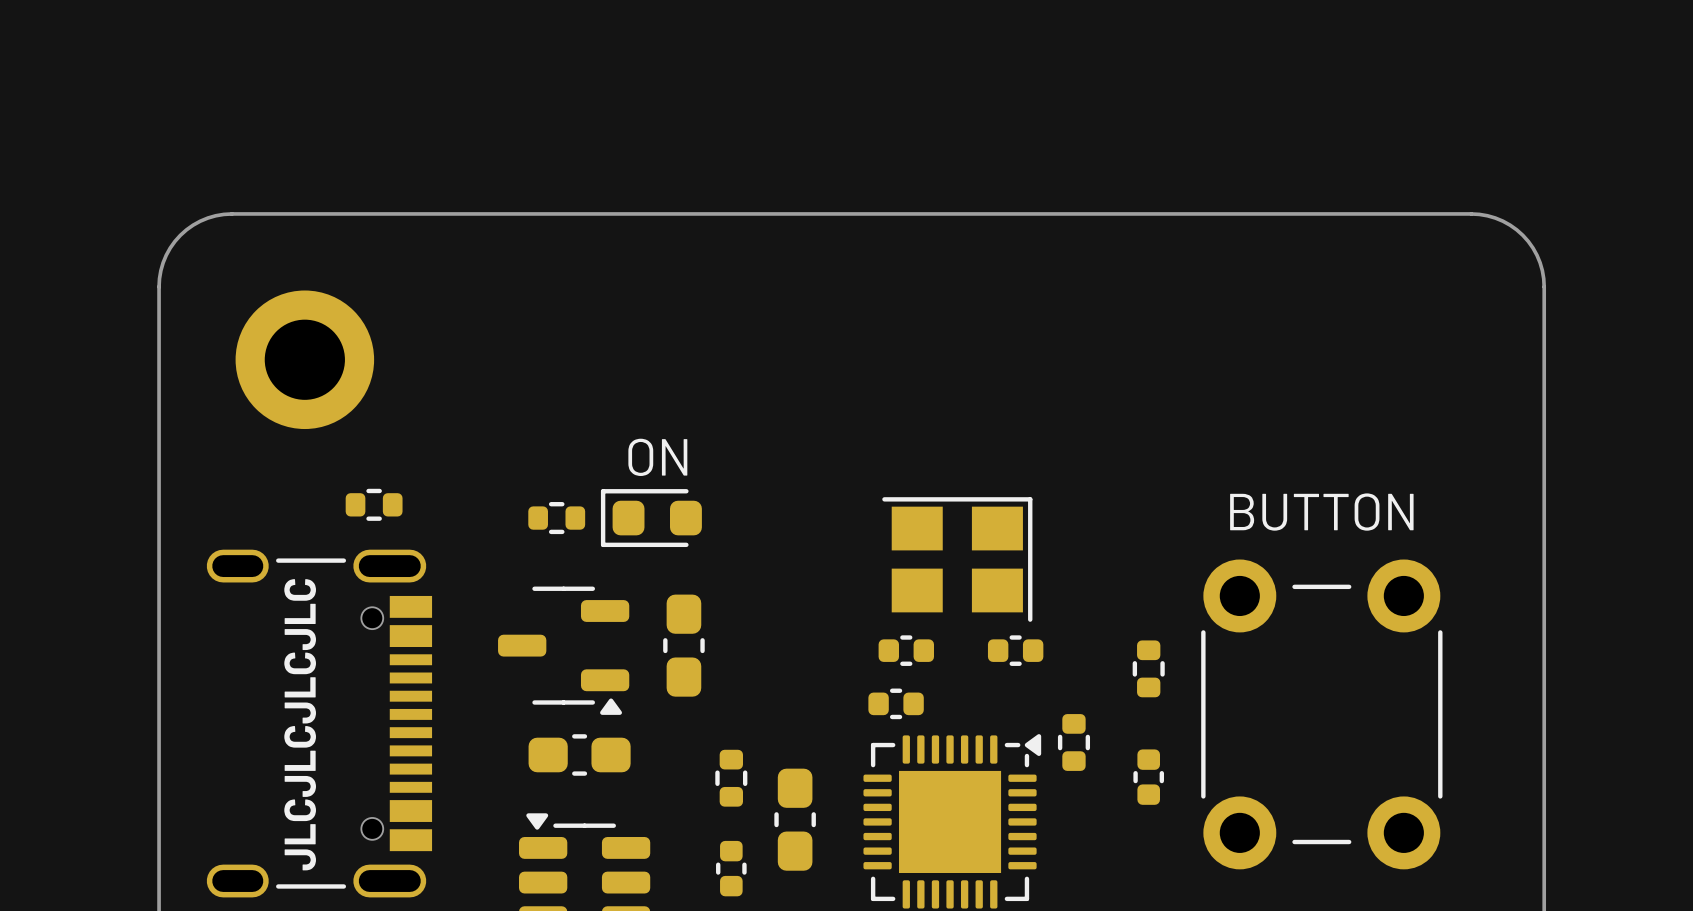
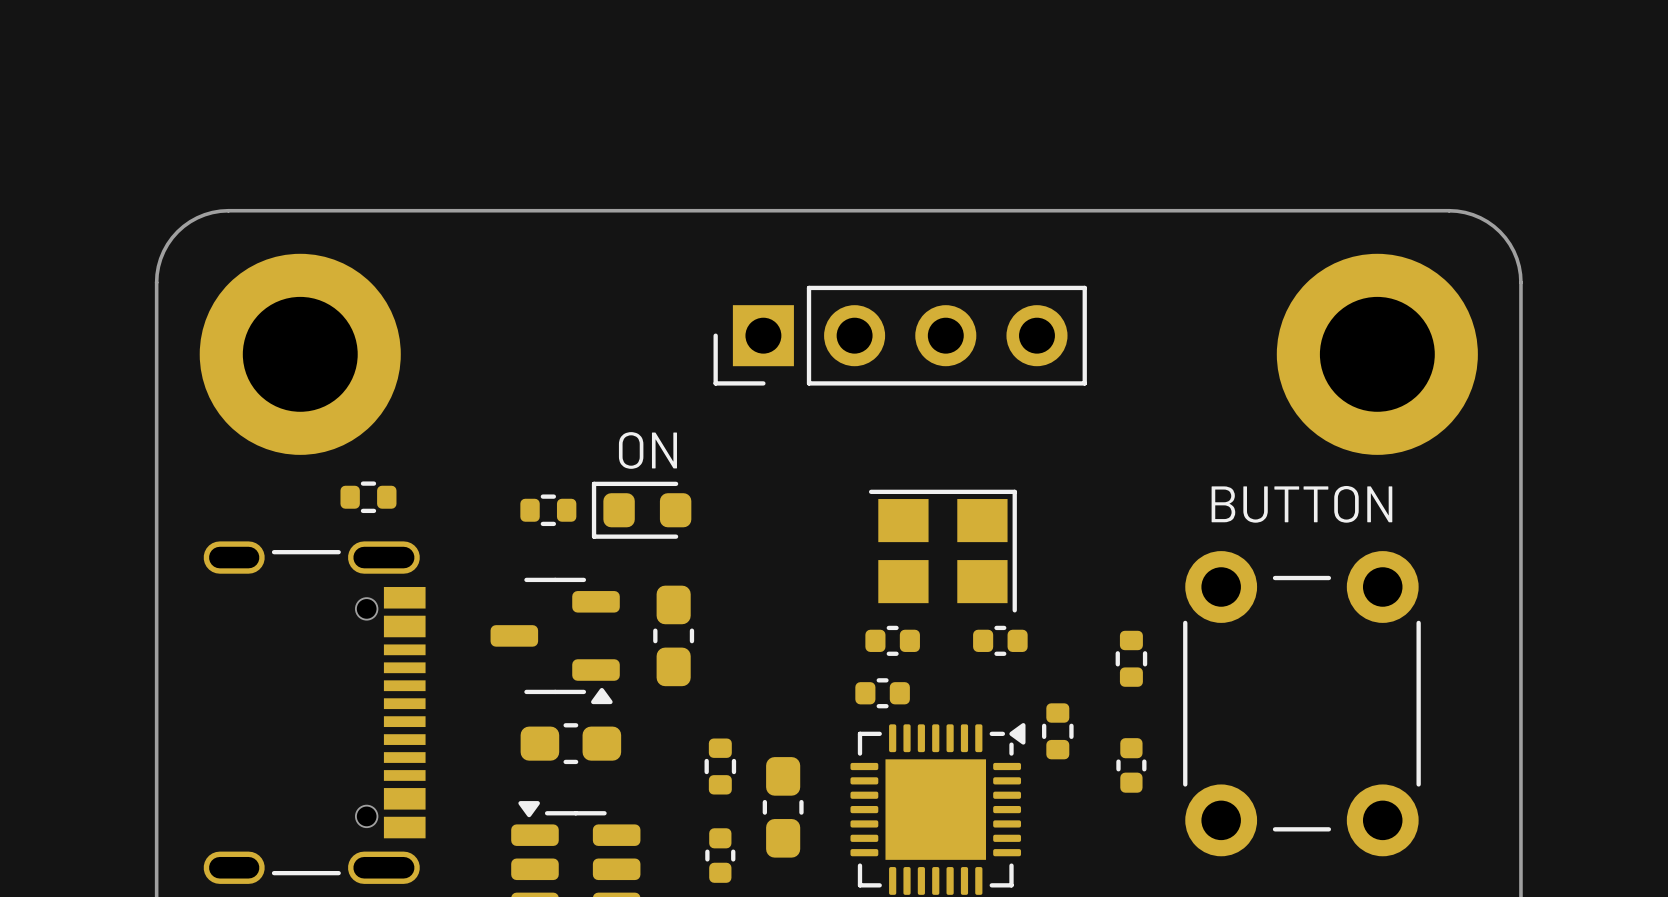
part footprint: [235, 290, 375, 430] -> [199, 253, 401, 455]
part: none -> (900, 335)
part: none -> (1377, 354)
text: JLCJLCJLCJLC (300, 724) -> none

